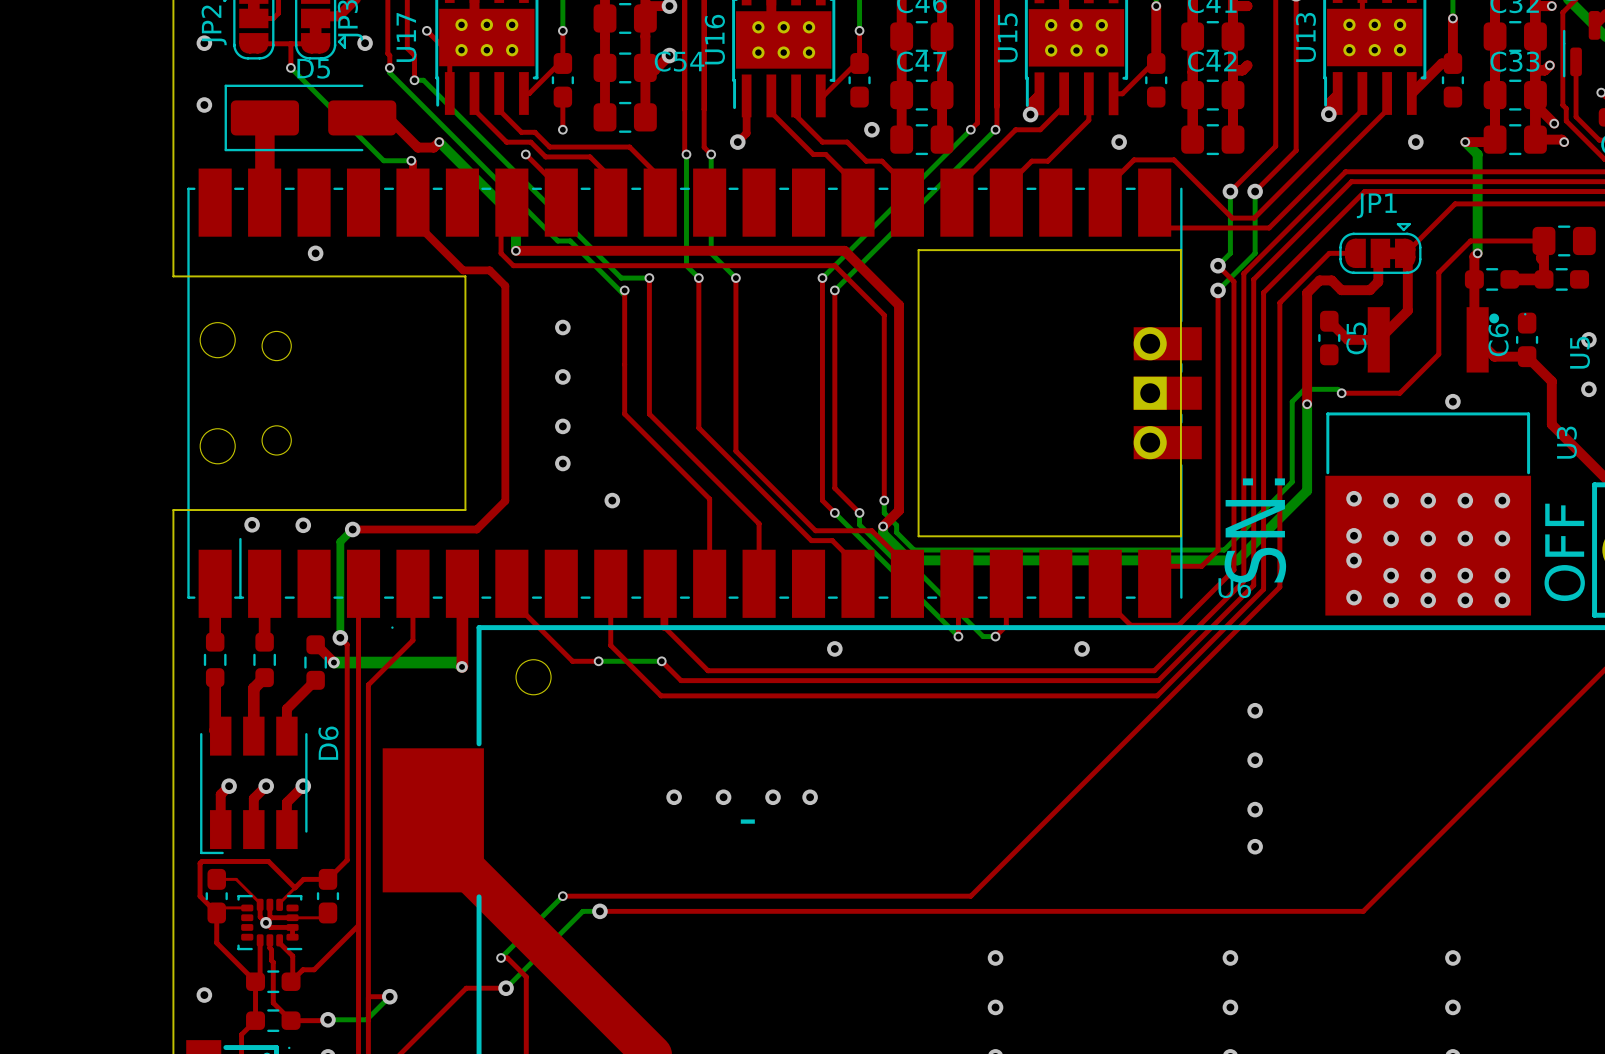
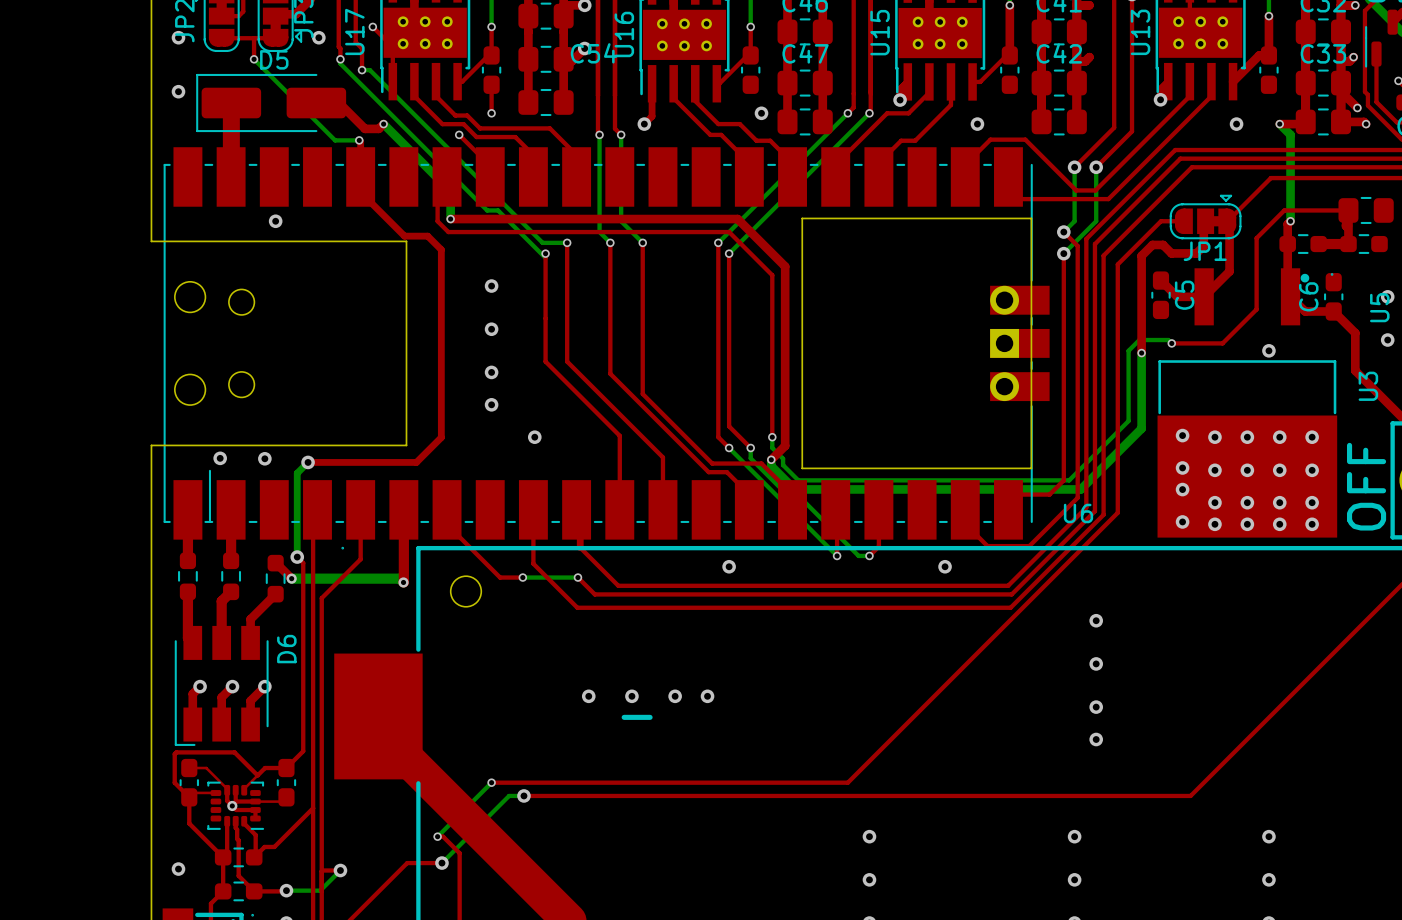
JP1 name position: JP1 (1376, 205) -> JP1 (1205, 251)
text: SN: (1255, 530) -> none

